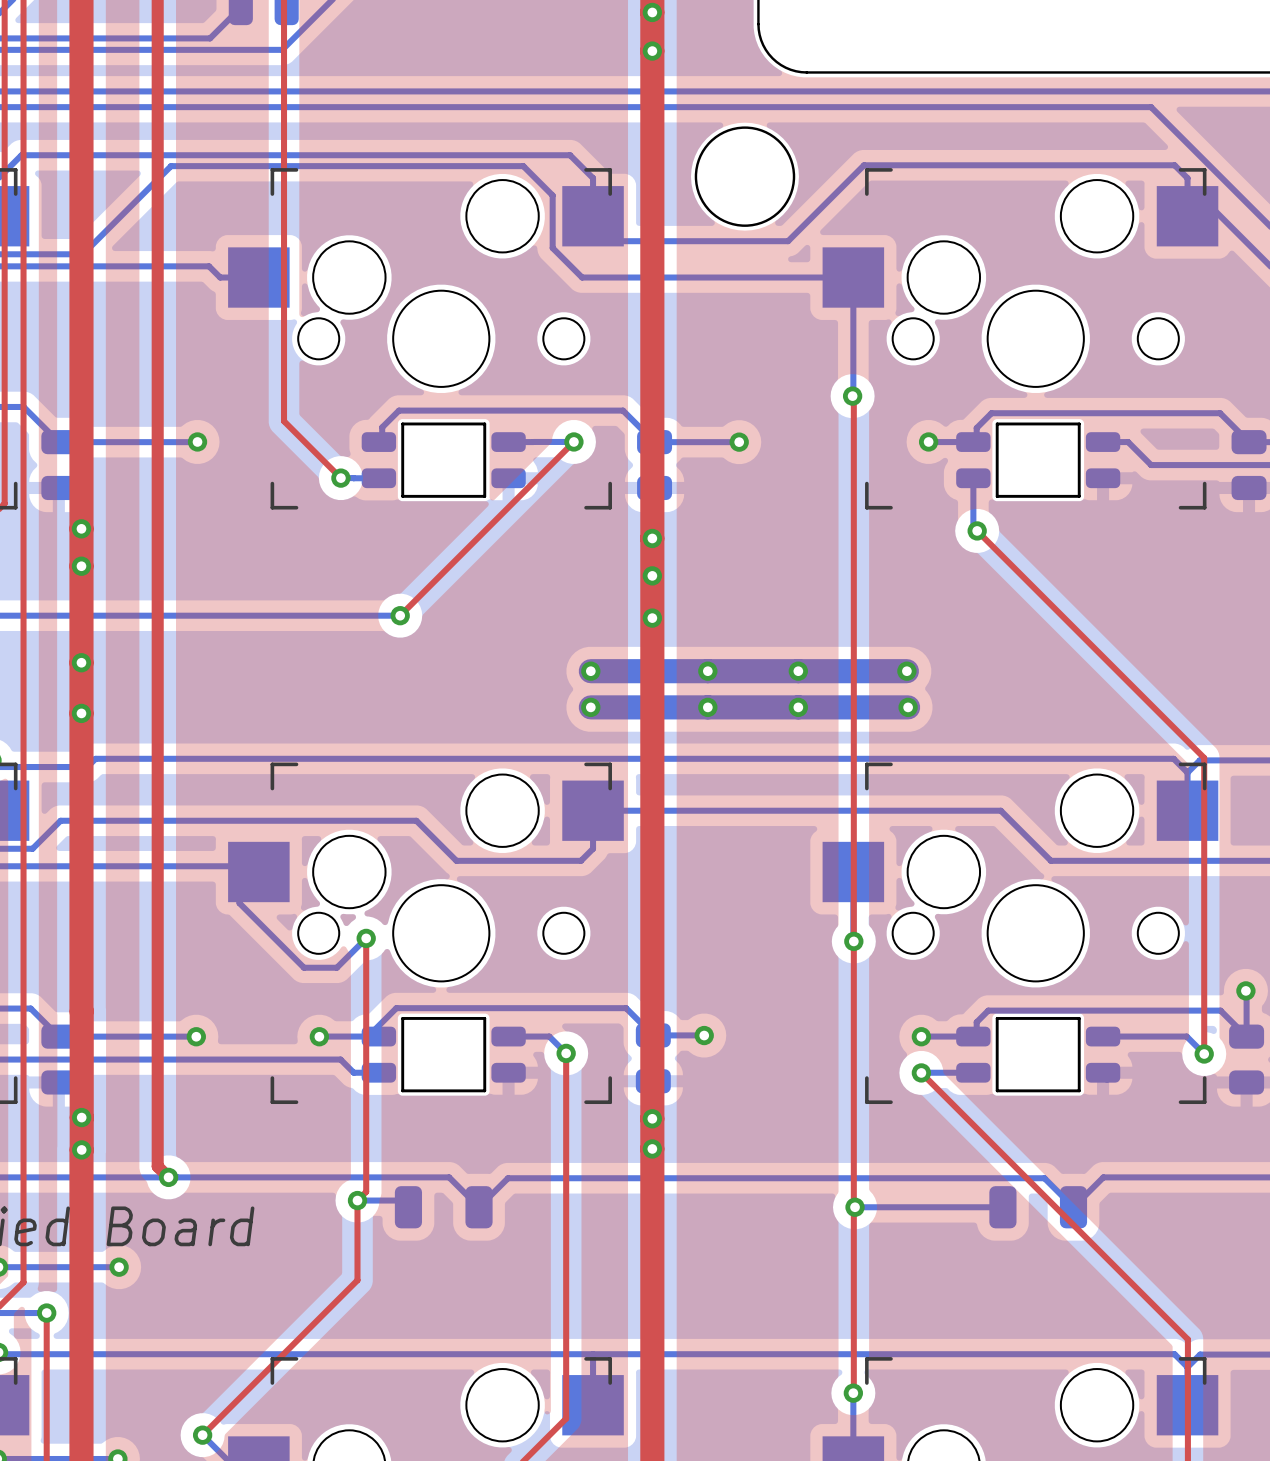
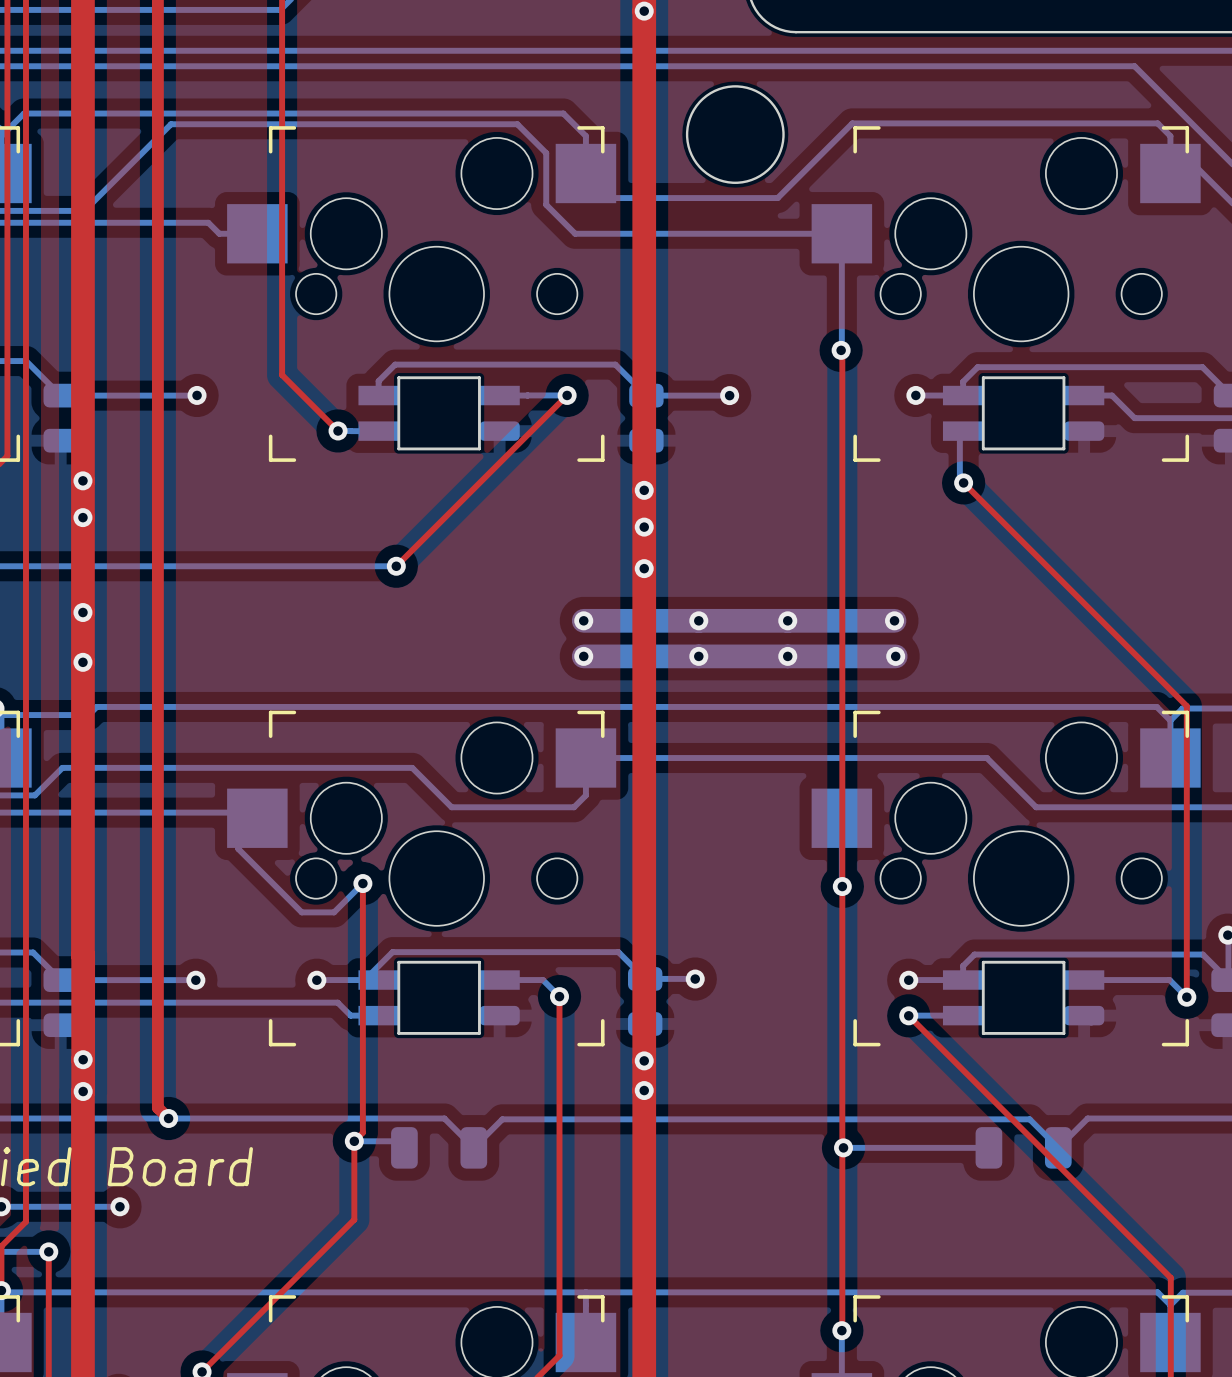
part footprint: [361, 422, 526, 498] -> [358, 376, 520, 451]
part footprint: [956, 422, 1121, 498] -> [942, 376, 1105, 451]
part footprint: [361, 1017, 526, 1093] -> [358, 960, 520, 1035]
part footprint: [956, 1017, 1121, 1093] -> [942, 960, 1105, 1035]

